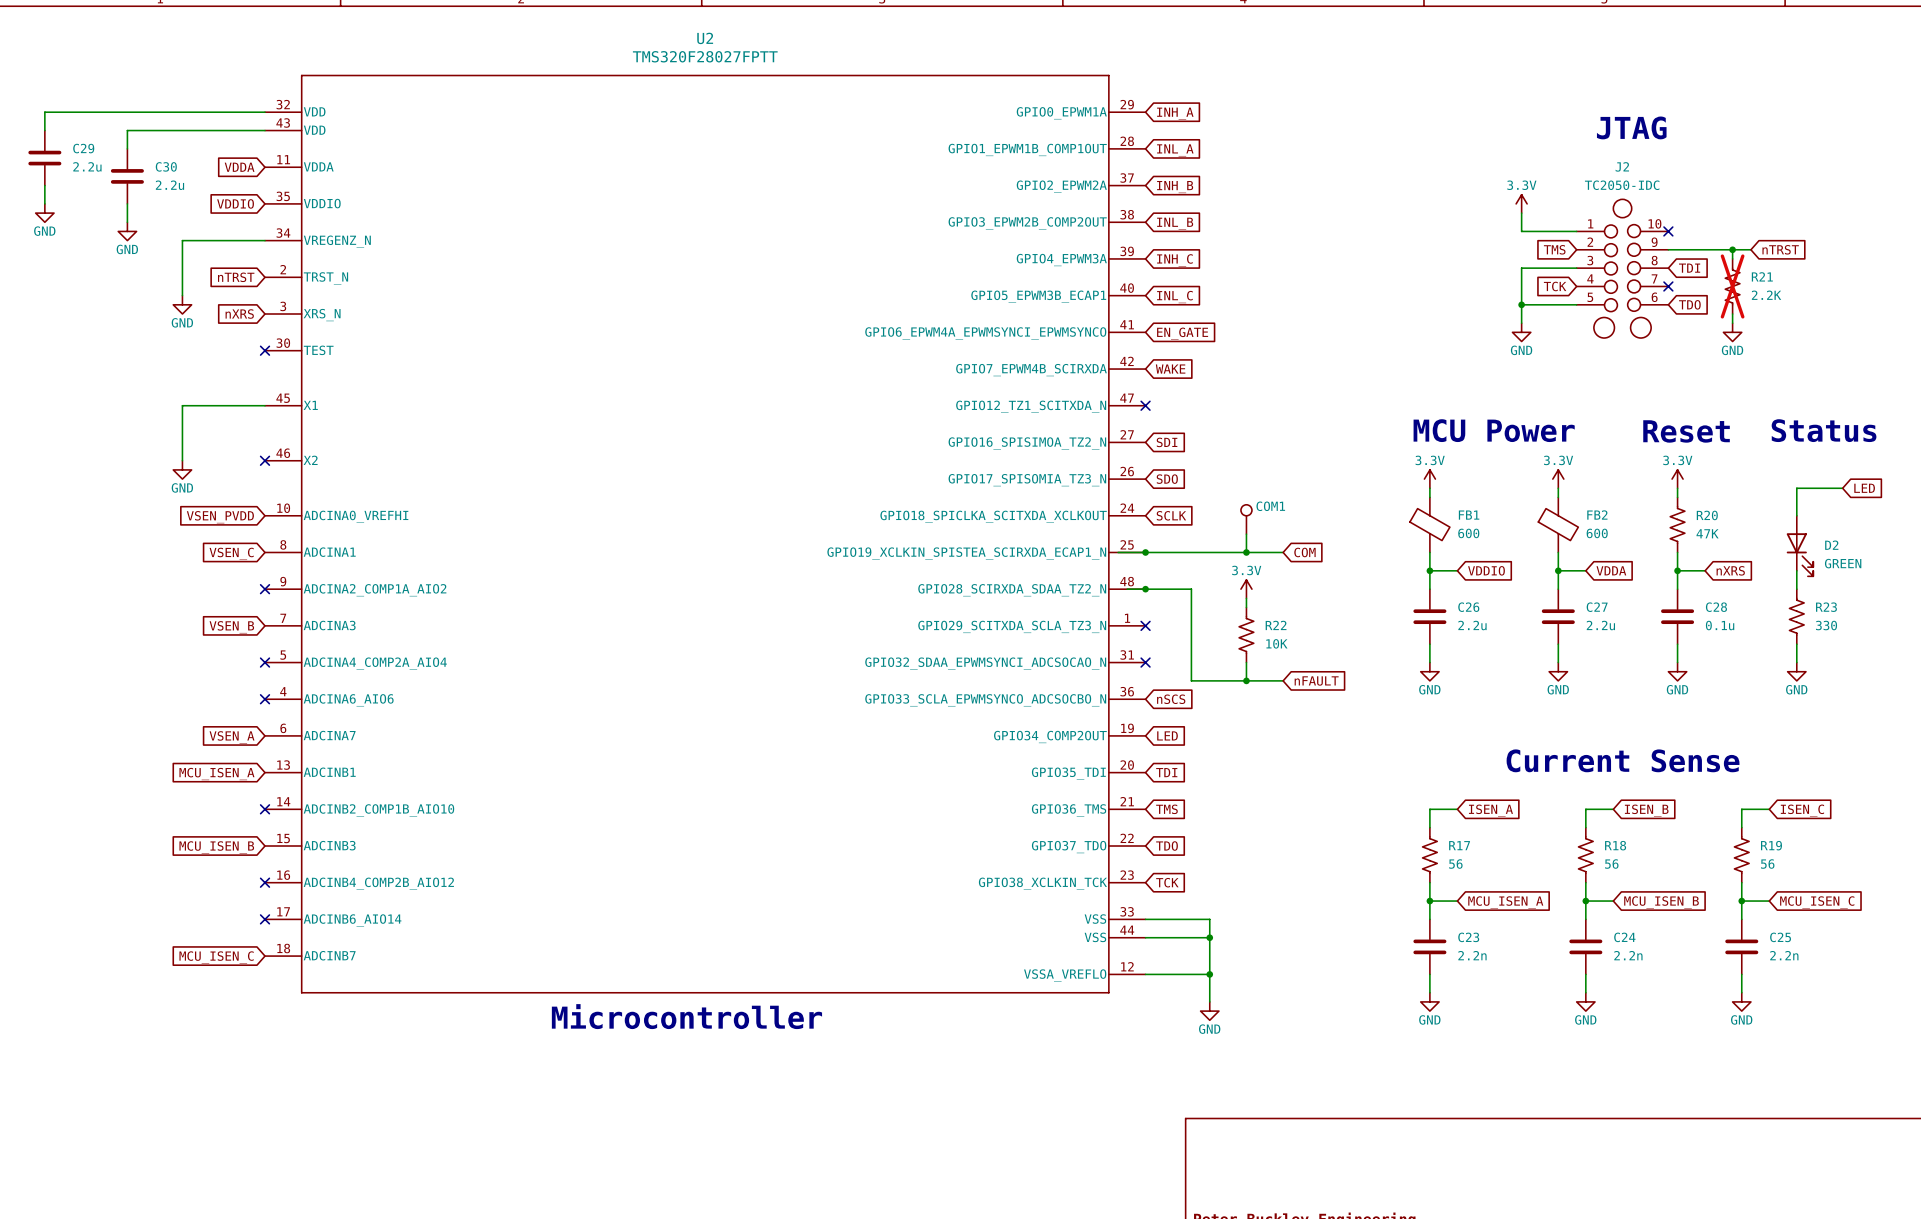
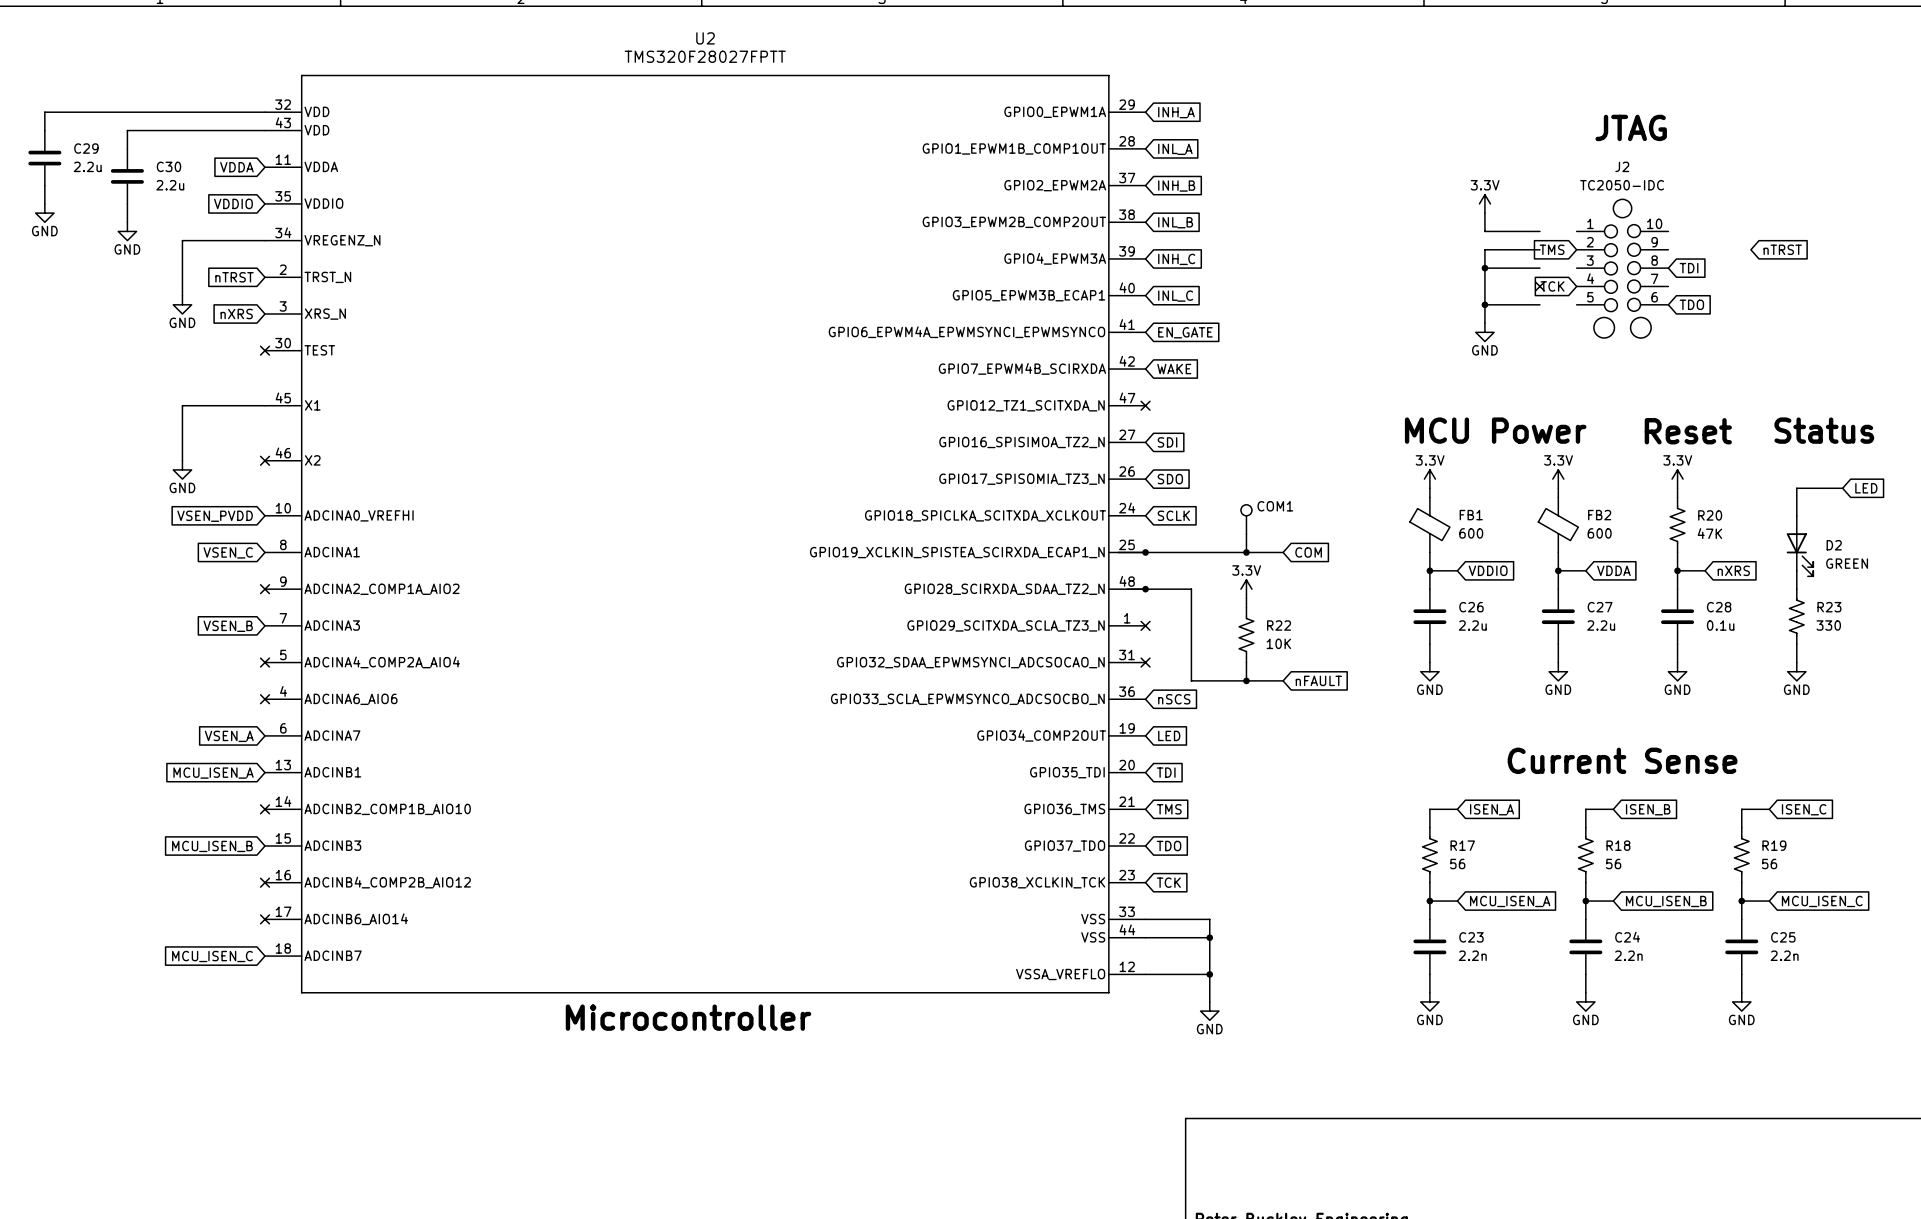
power symbol position: 3.3V (1521, 203) -> 3.3V (1484, 203)
wire: (1521, 213) (1521, 231) -> (1484, 213) (1484, 231) (1521, 231)
wire: (1539, 231) (1576, 231) -> none
no-connect mark: (1668, 231) -> none
wire: none -> (1539, 249) (1484, 249) (1484, 323)
wire: (1668, 249) (1750, 249) -> none
wire: (1732, 249) (1732, 258) -> none
junction: (1732, 249) -> none
junction: none -> (1484, 268)
wire: (1521, 268) (1521, 323) -> (1521, 268) (1484, 268)
wire: (1539, 268) (1576, 268) -> none
no-connect mark: none -> (1539, 286)
no-connect mark: (1668, 286) -> none
R21: 2.2K (1732, 286) -> none
junction: none -> (1484, 304)
junction: (1521, 304) -> none
wire: (1539, 304) (1576, 304) -> (1484, 304) (1521, 304)
wire: (1732, 314) (1732, 323) -> none
power symbol position: GND (1521, 332) -> GND (1484, 332)
power symbol: GND (1732, 332) -> none

